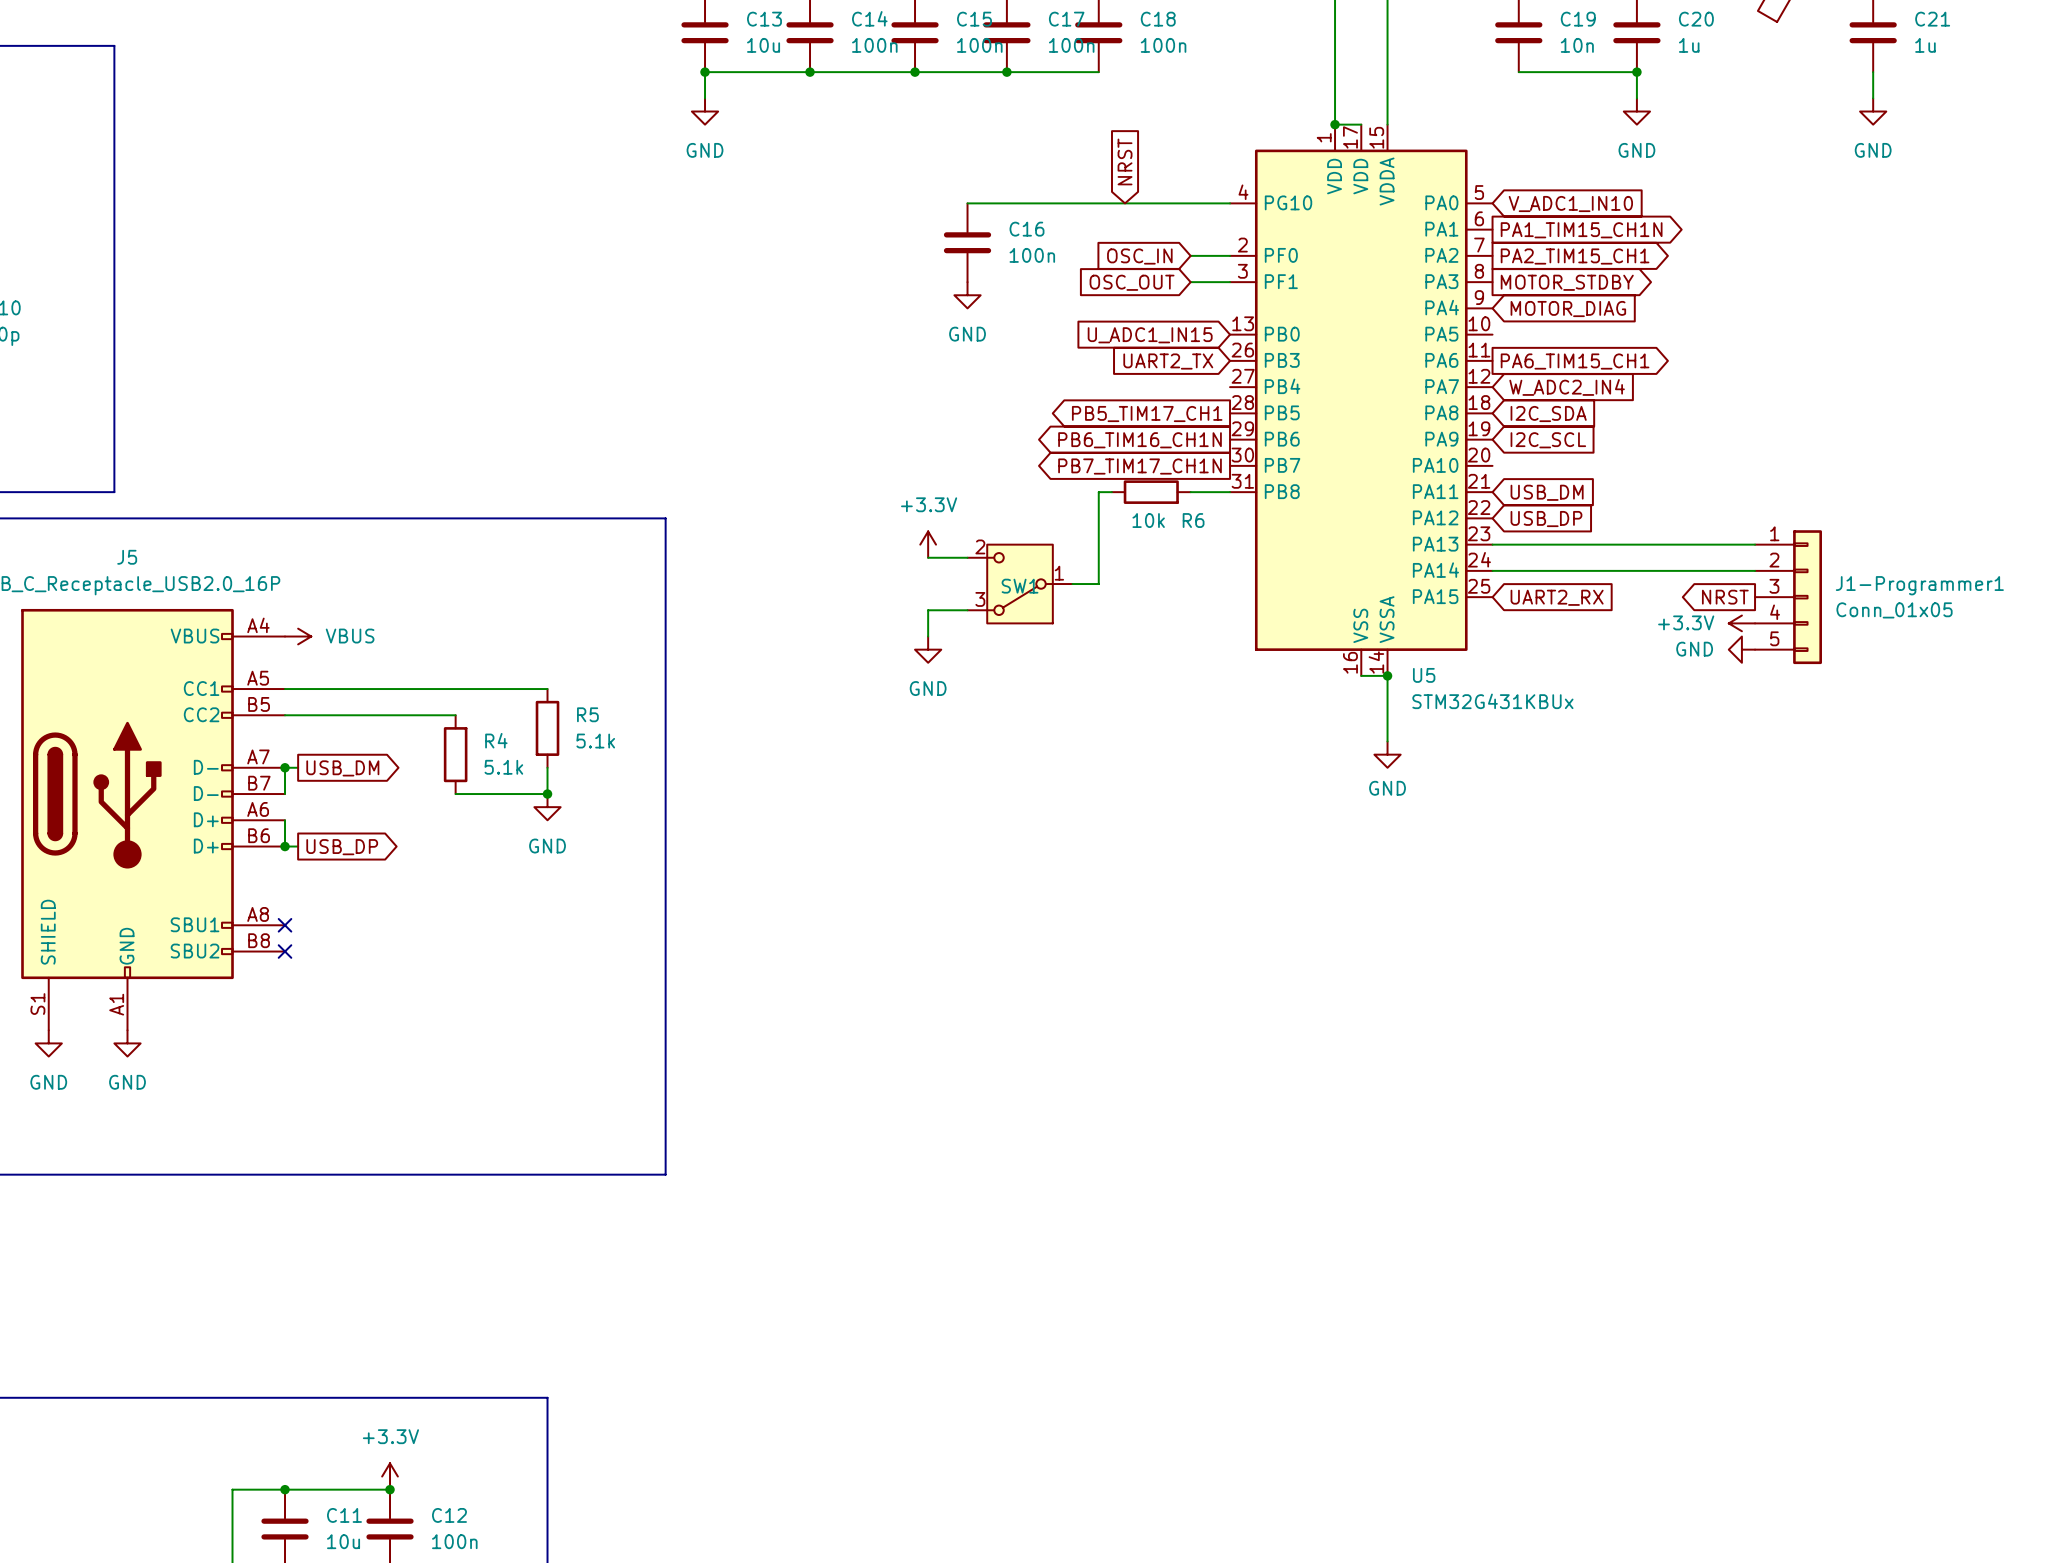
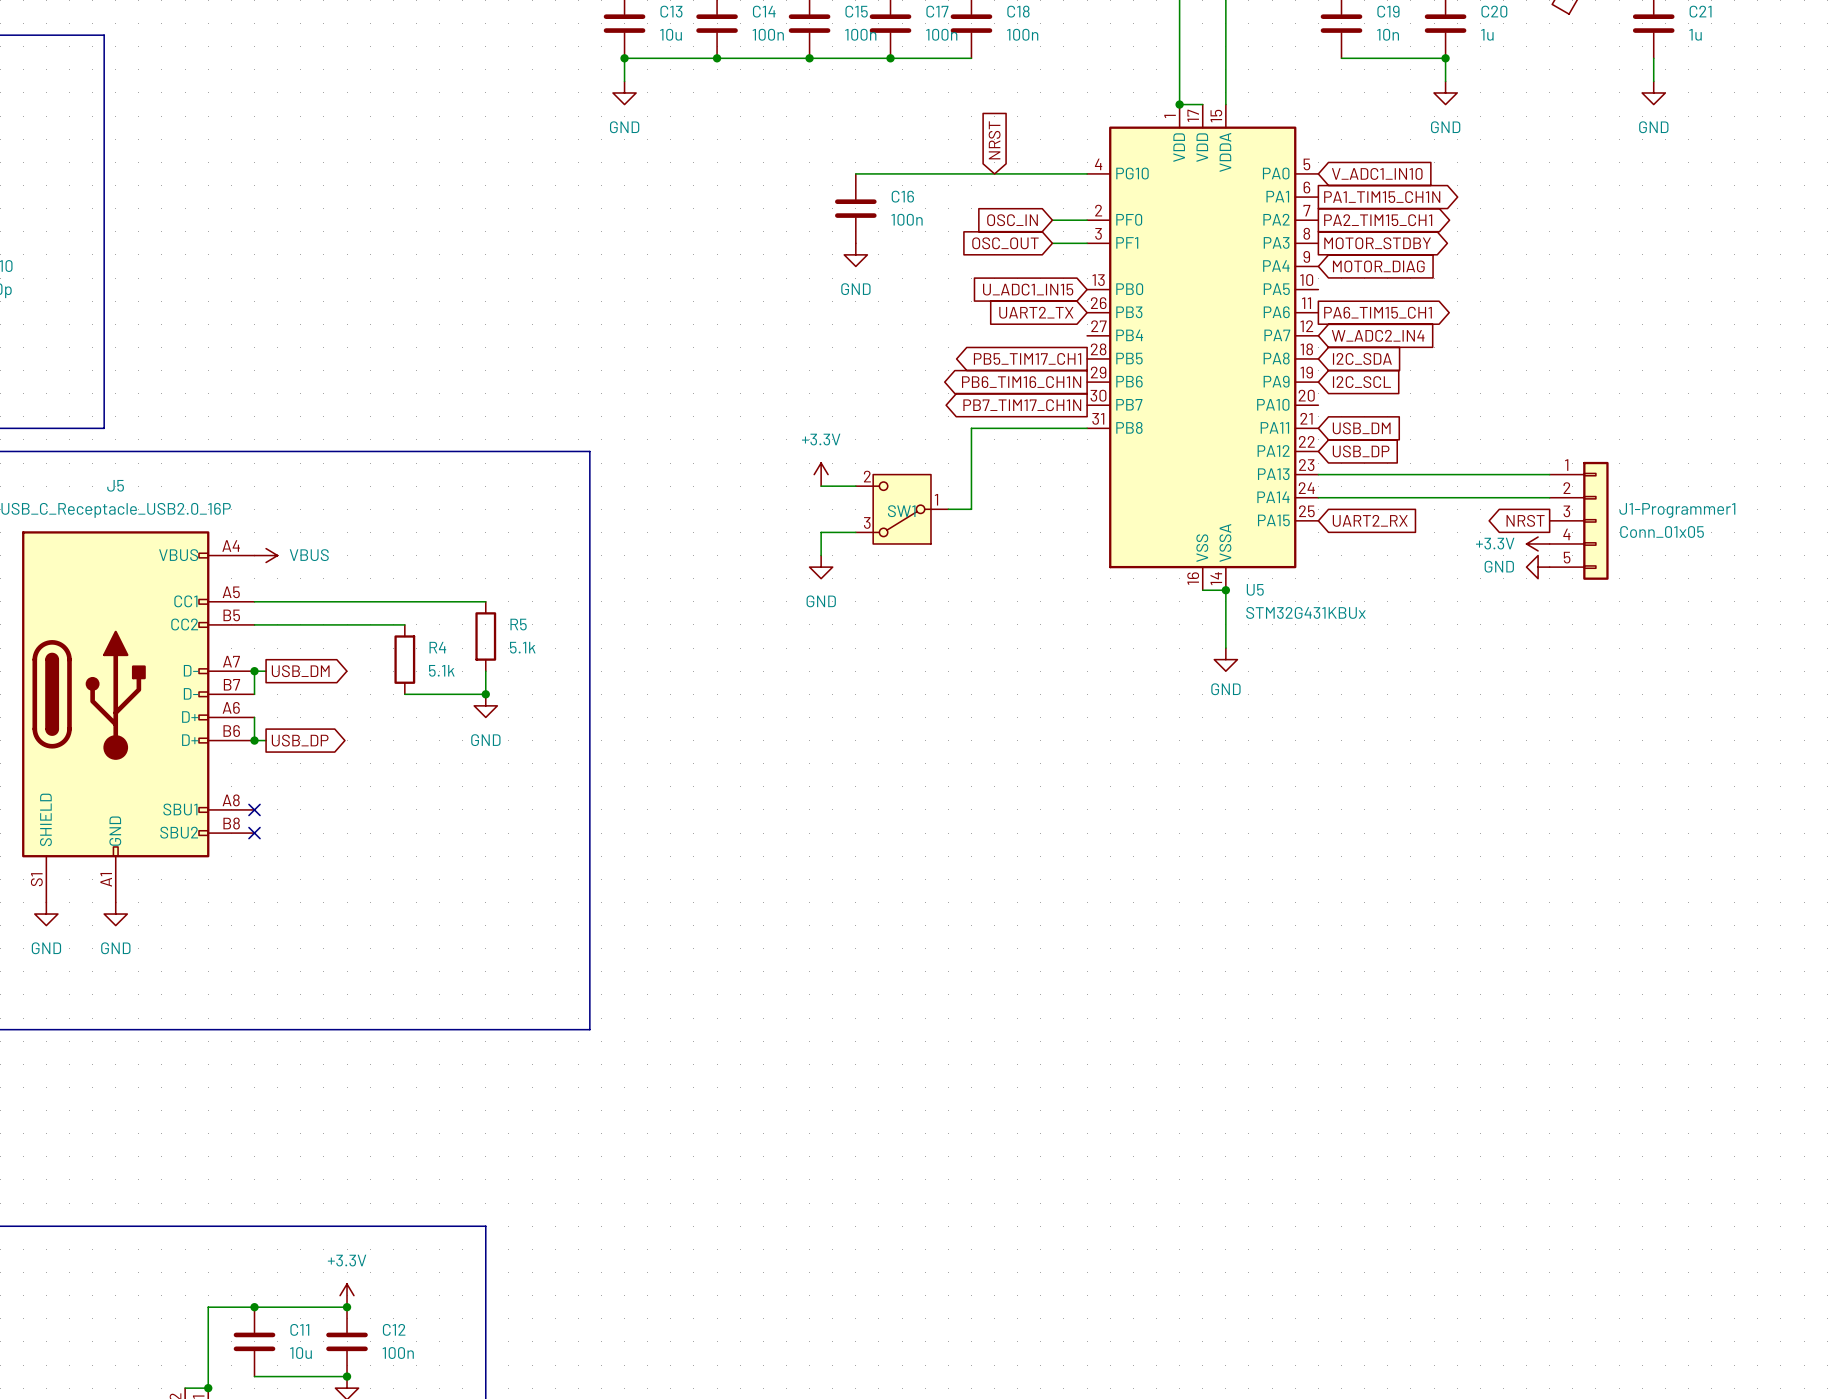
wire: none -> (983, 428) (1052, 428)
R6: 10k (1151, 492) -> none

